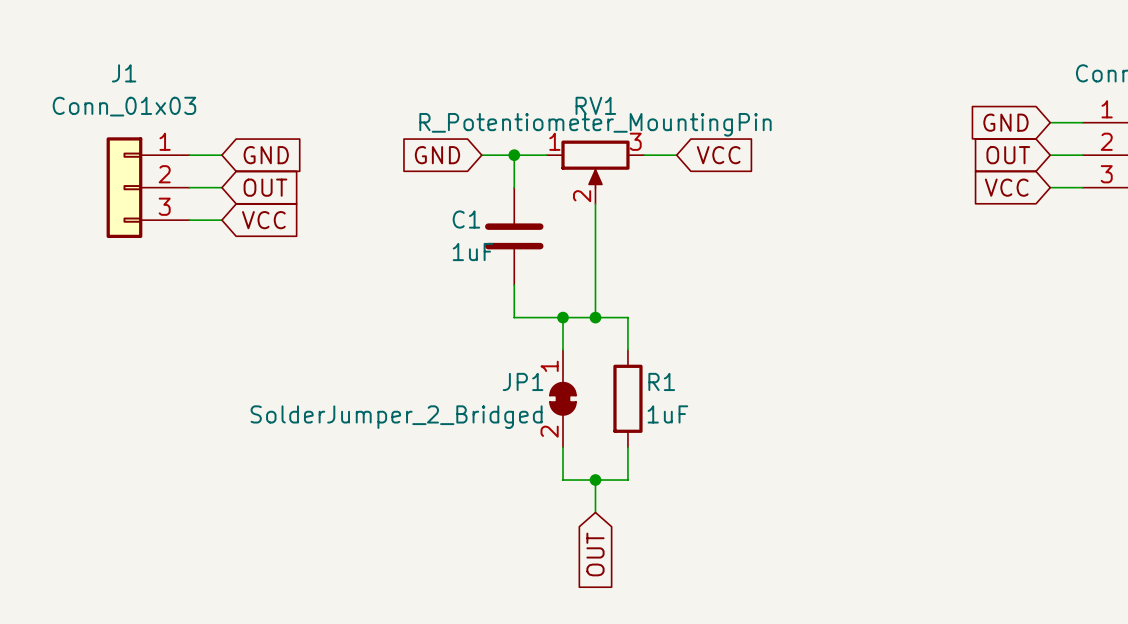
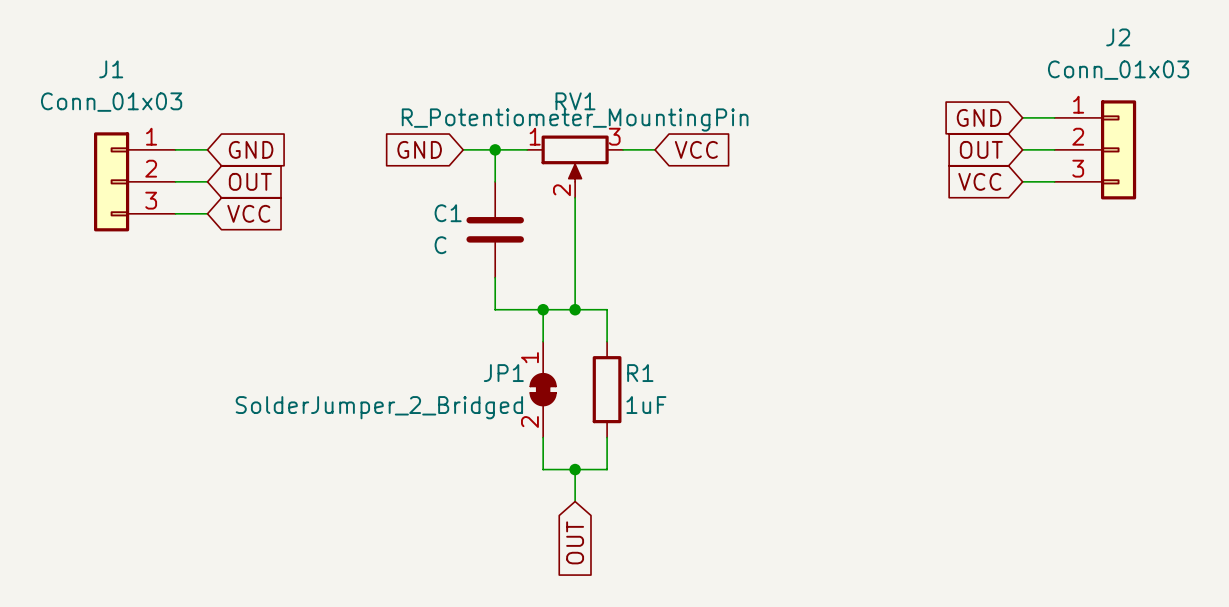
C1 value: 1uF (473, 252) -> C (440, 245)

